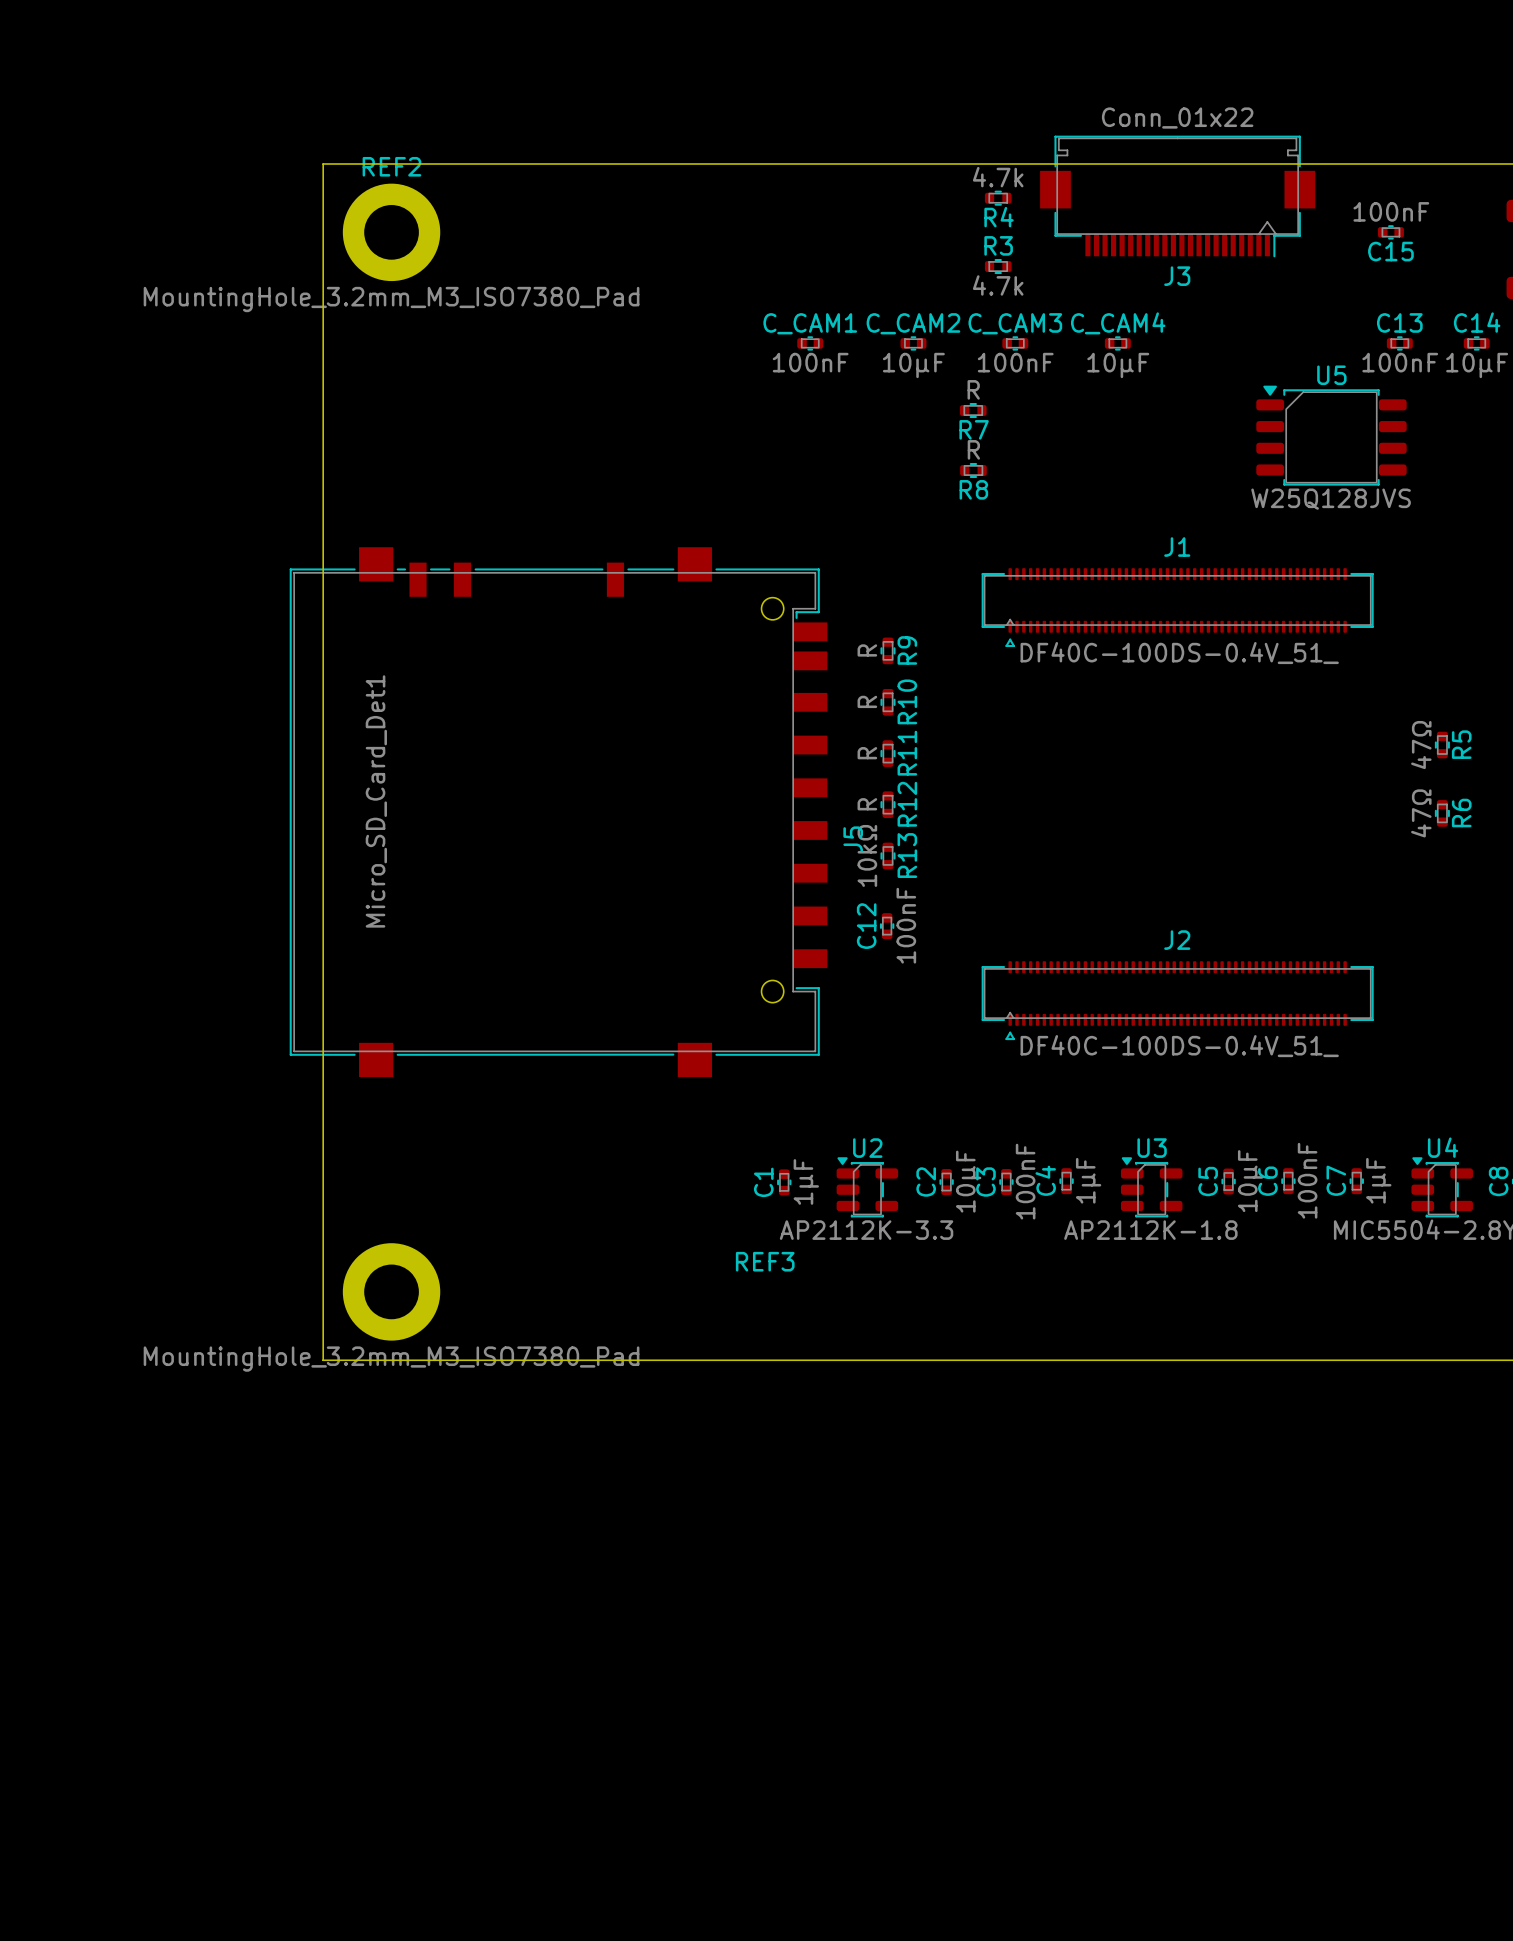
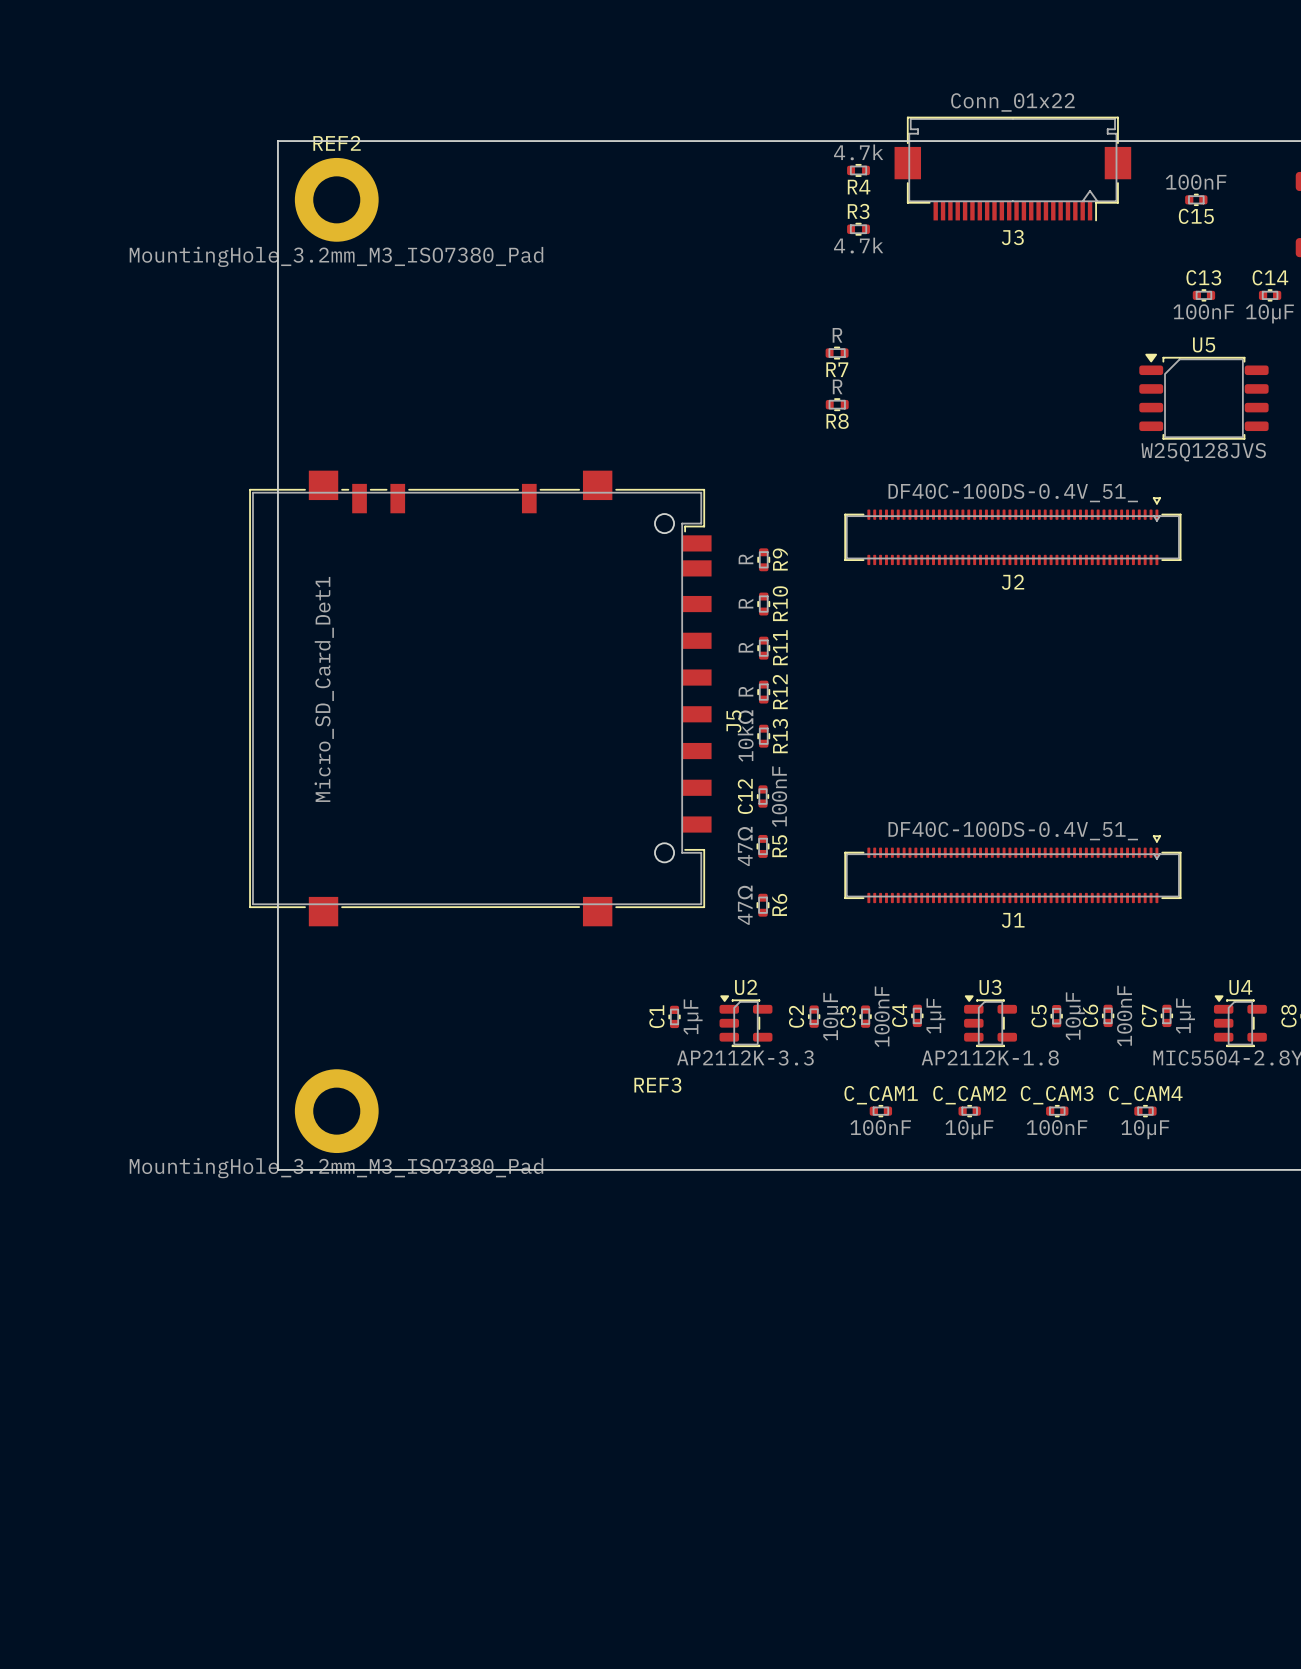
C_CAM1 position: (810, 343) -> (880, 1111)
C_CAM2 position: (913, 343) -> (969, 1111)
C_CAM3 position: (1015, 343) -> (1057, 1111)
C_CAM4 position: (1117, 343) -> (1145, 1111)
U5 position: (1331, 435) -> (1203, 396)
J1 rotation: 0° (1177, 607) -> 180° (1012, 869)
J1 position: (1177, 607) -> (1012, 869)
R5 position: (1442, 745) -> (763, 846)
R6 position: (1442, 813) -> (763, 905)
J2 rotation: 0° (1177, 1000) -> 180° (1012, 531)
J2 position: (1177, 1000) -> (1012, 531)

